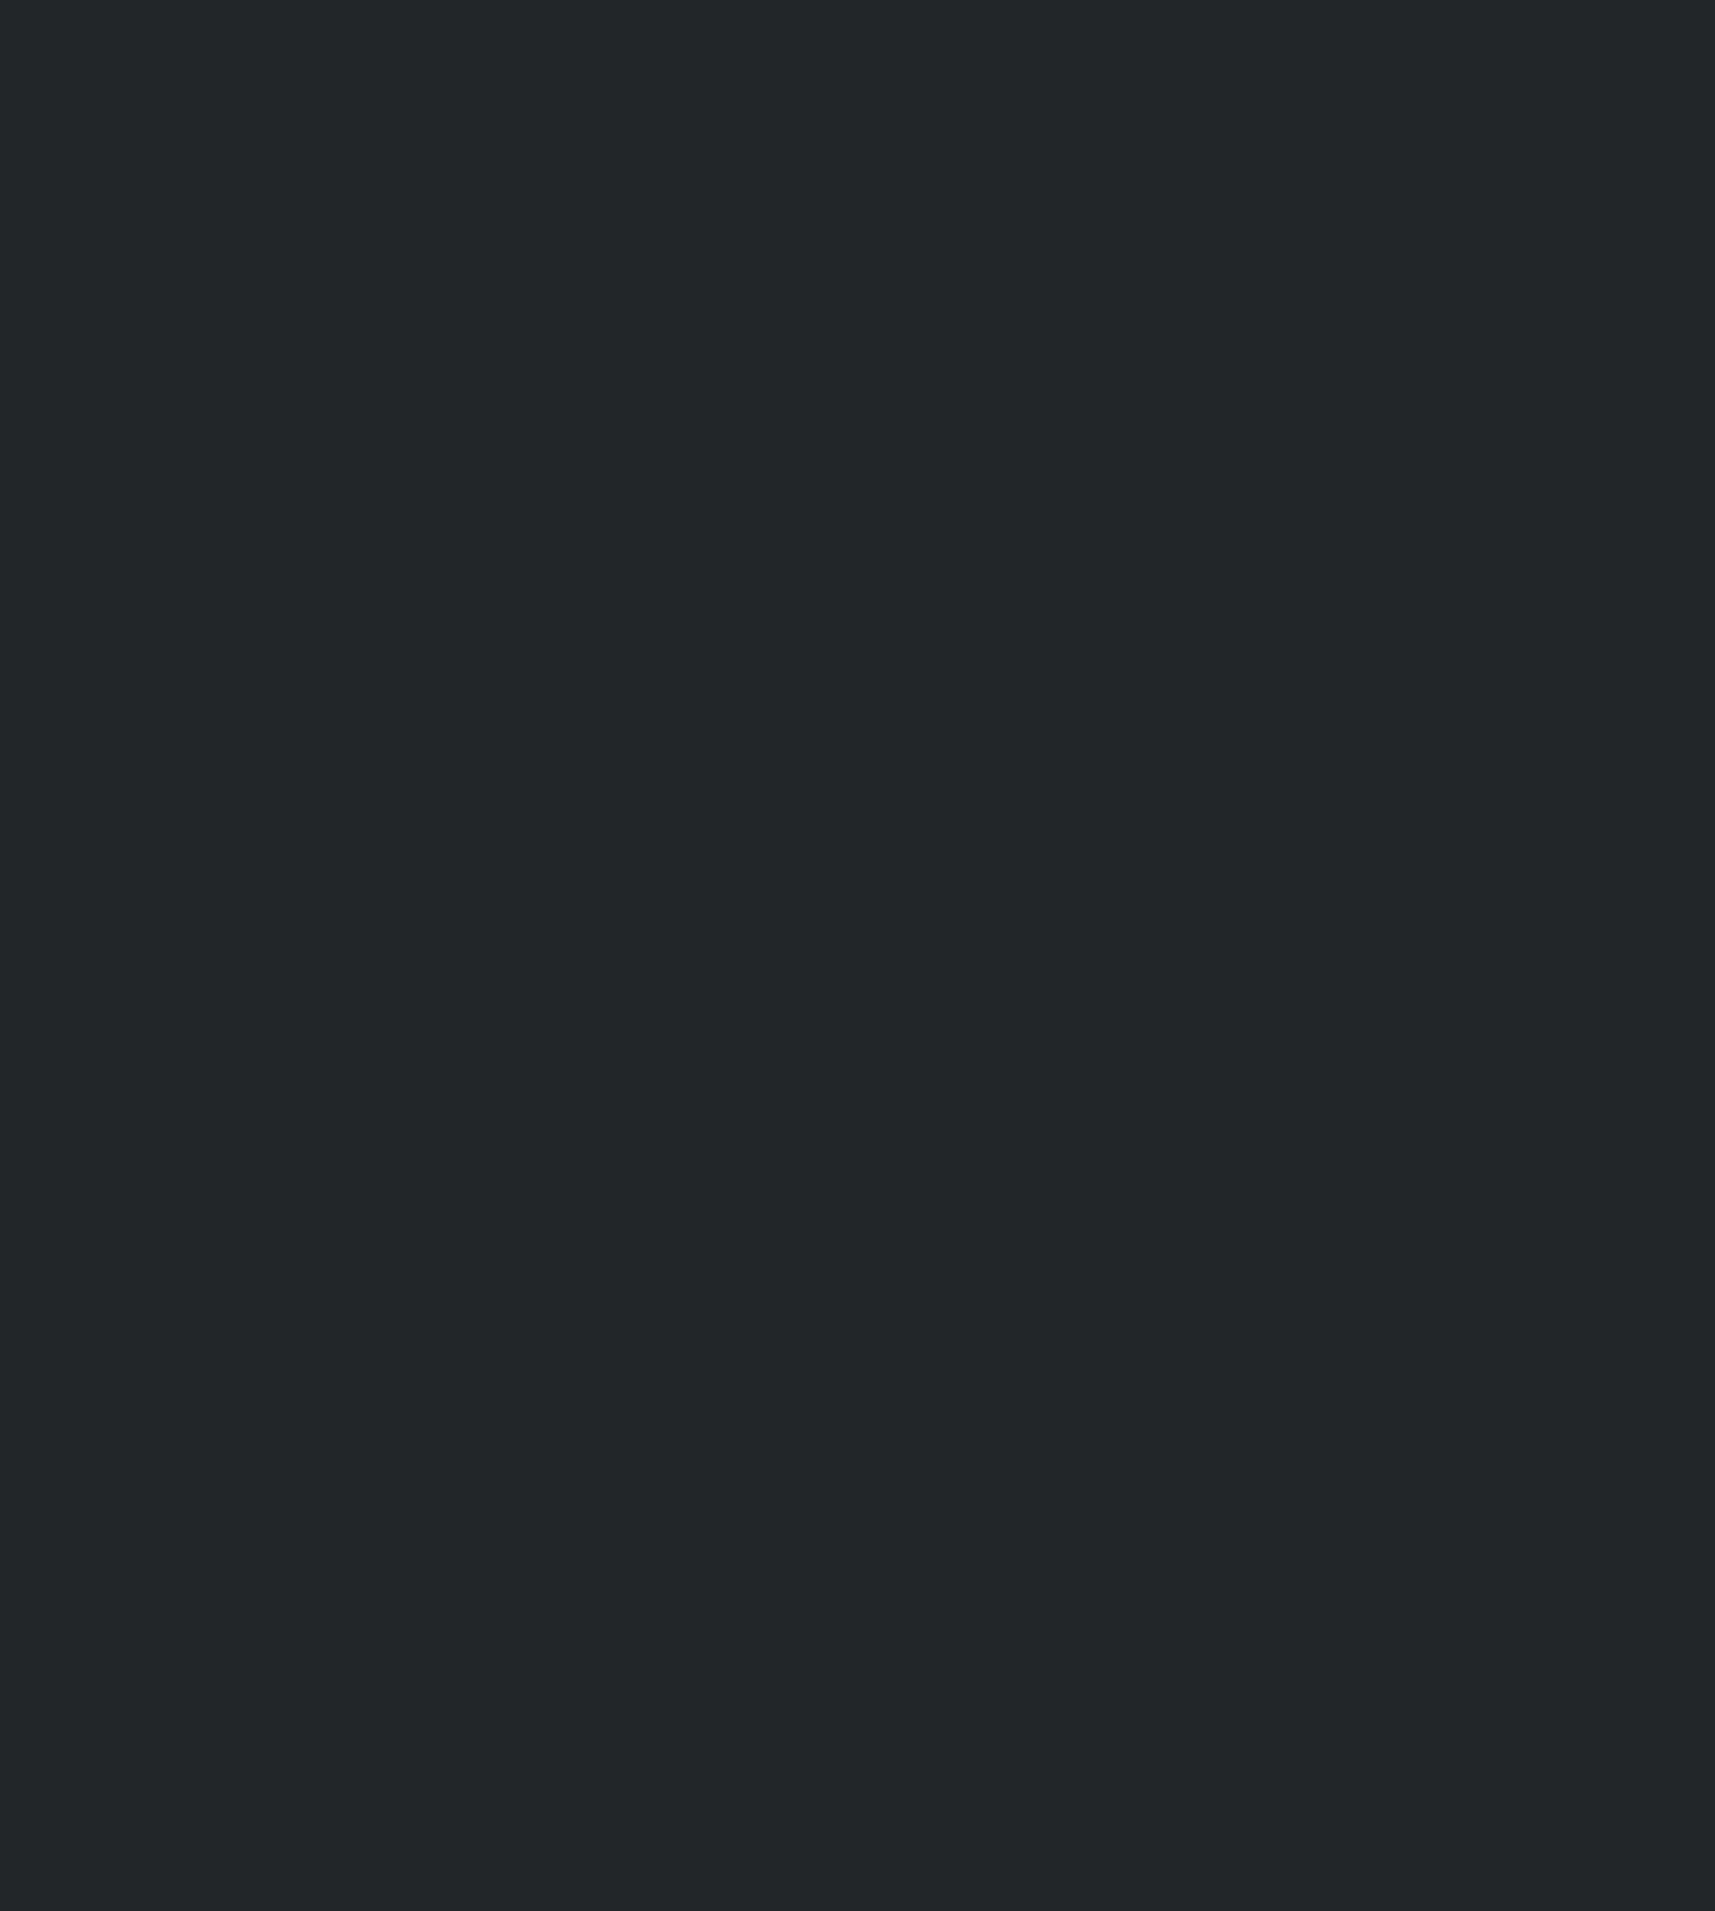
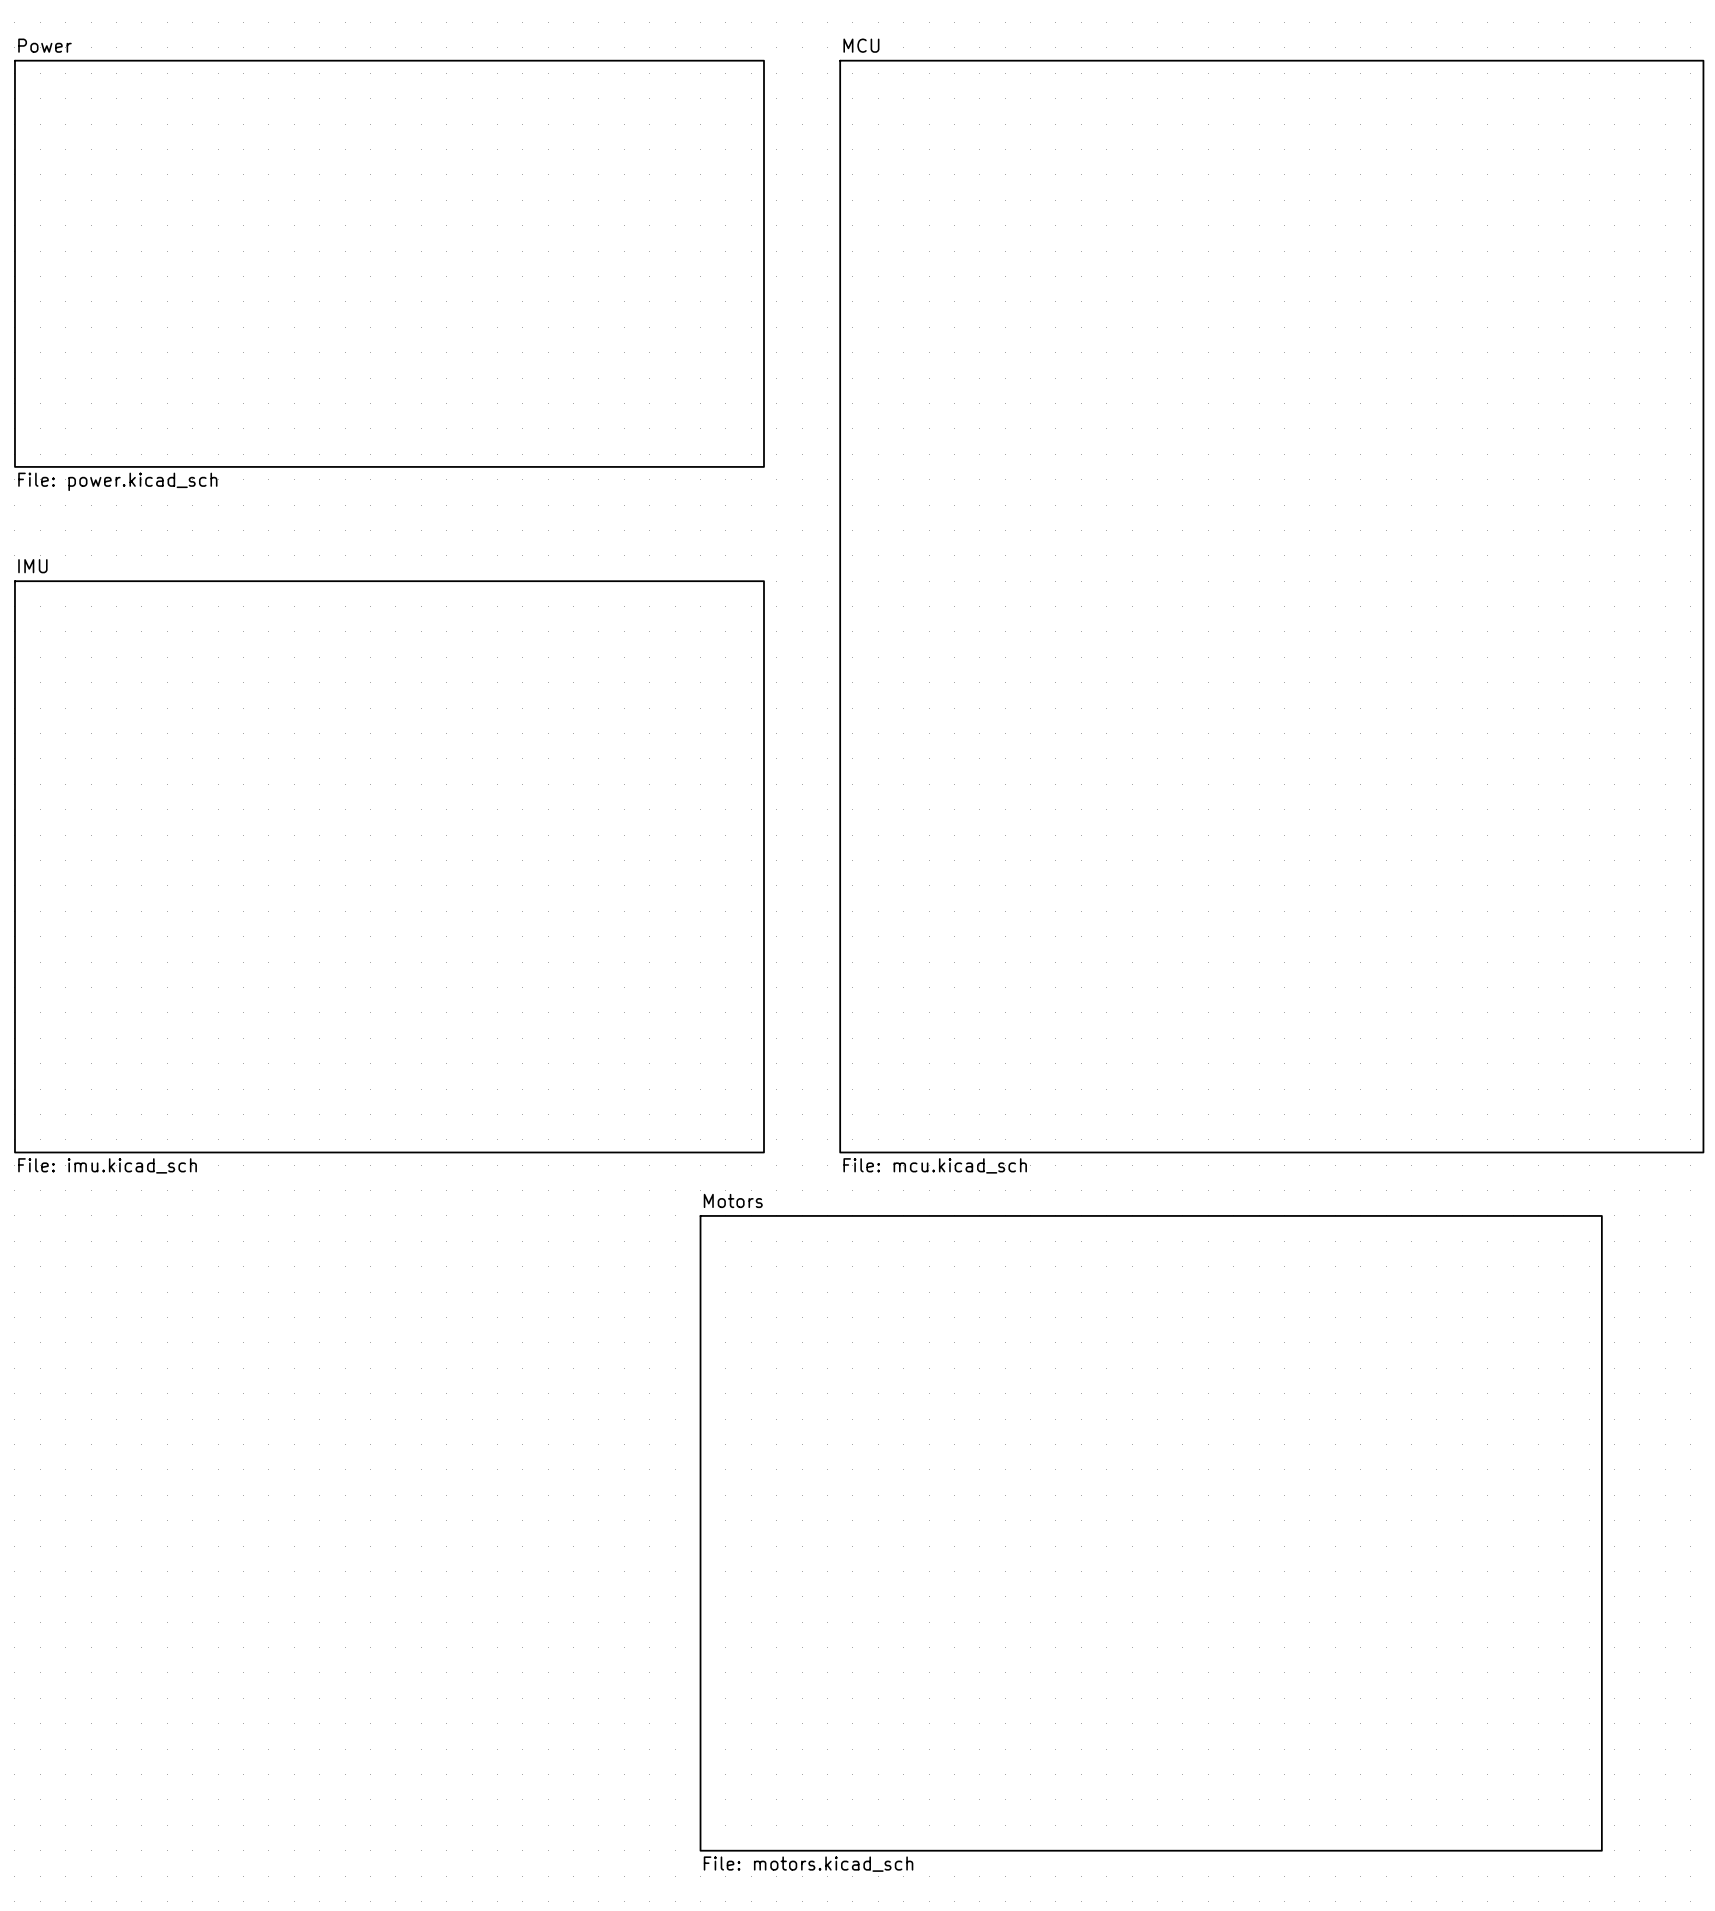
sheet Power: none -> File: power.kicad_sch (389, 263)
sheet MCU: none -> File: mcu.kicad_sch (1271, 606)
sheet IMU: none -> File: imu.kicad_sch (389, 866)
sheet Motors: none -> File: motors.kicad_sch (1151, 1533)

